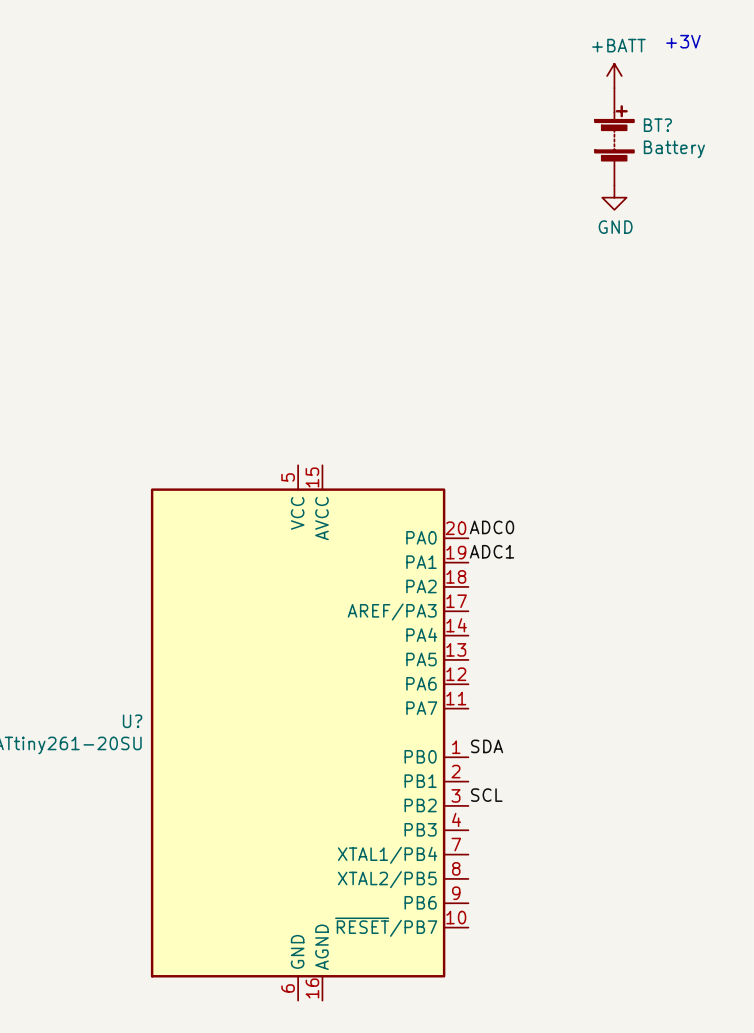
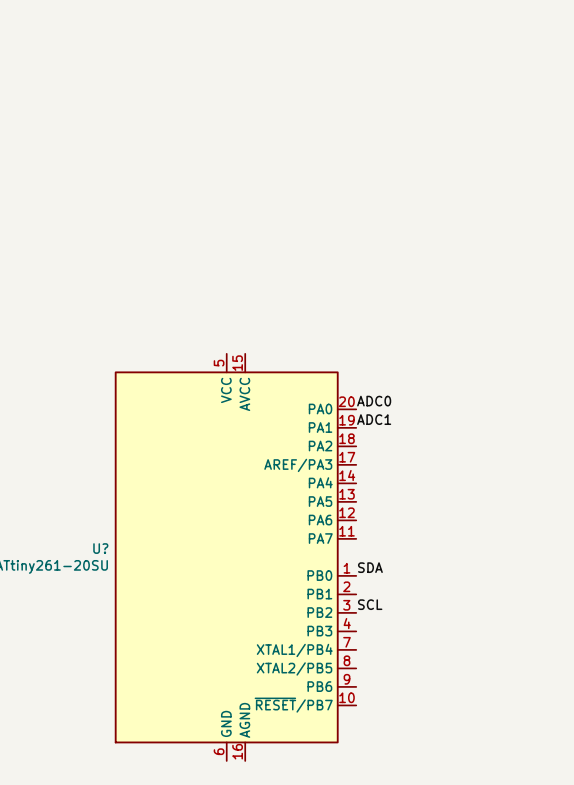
text: +3V (683, 41) -> none
power symbol: +BATT (614, 75) -> none
BT?: Battery (614, 136) -> none
power symbol: GND (614, 197) -> none

